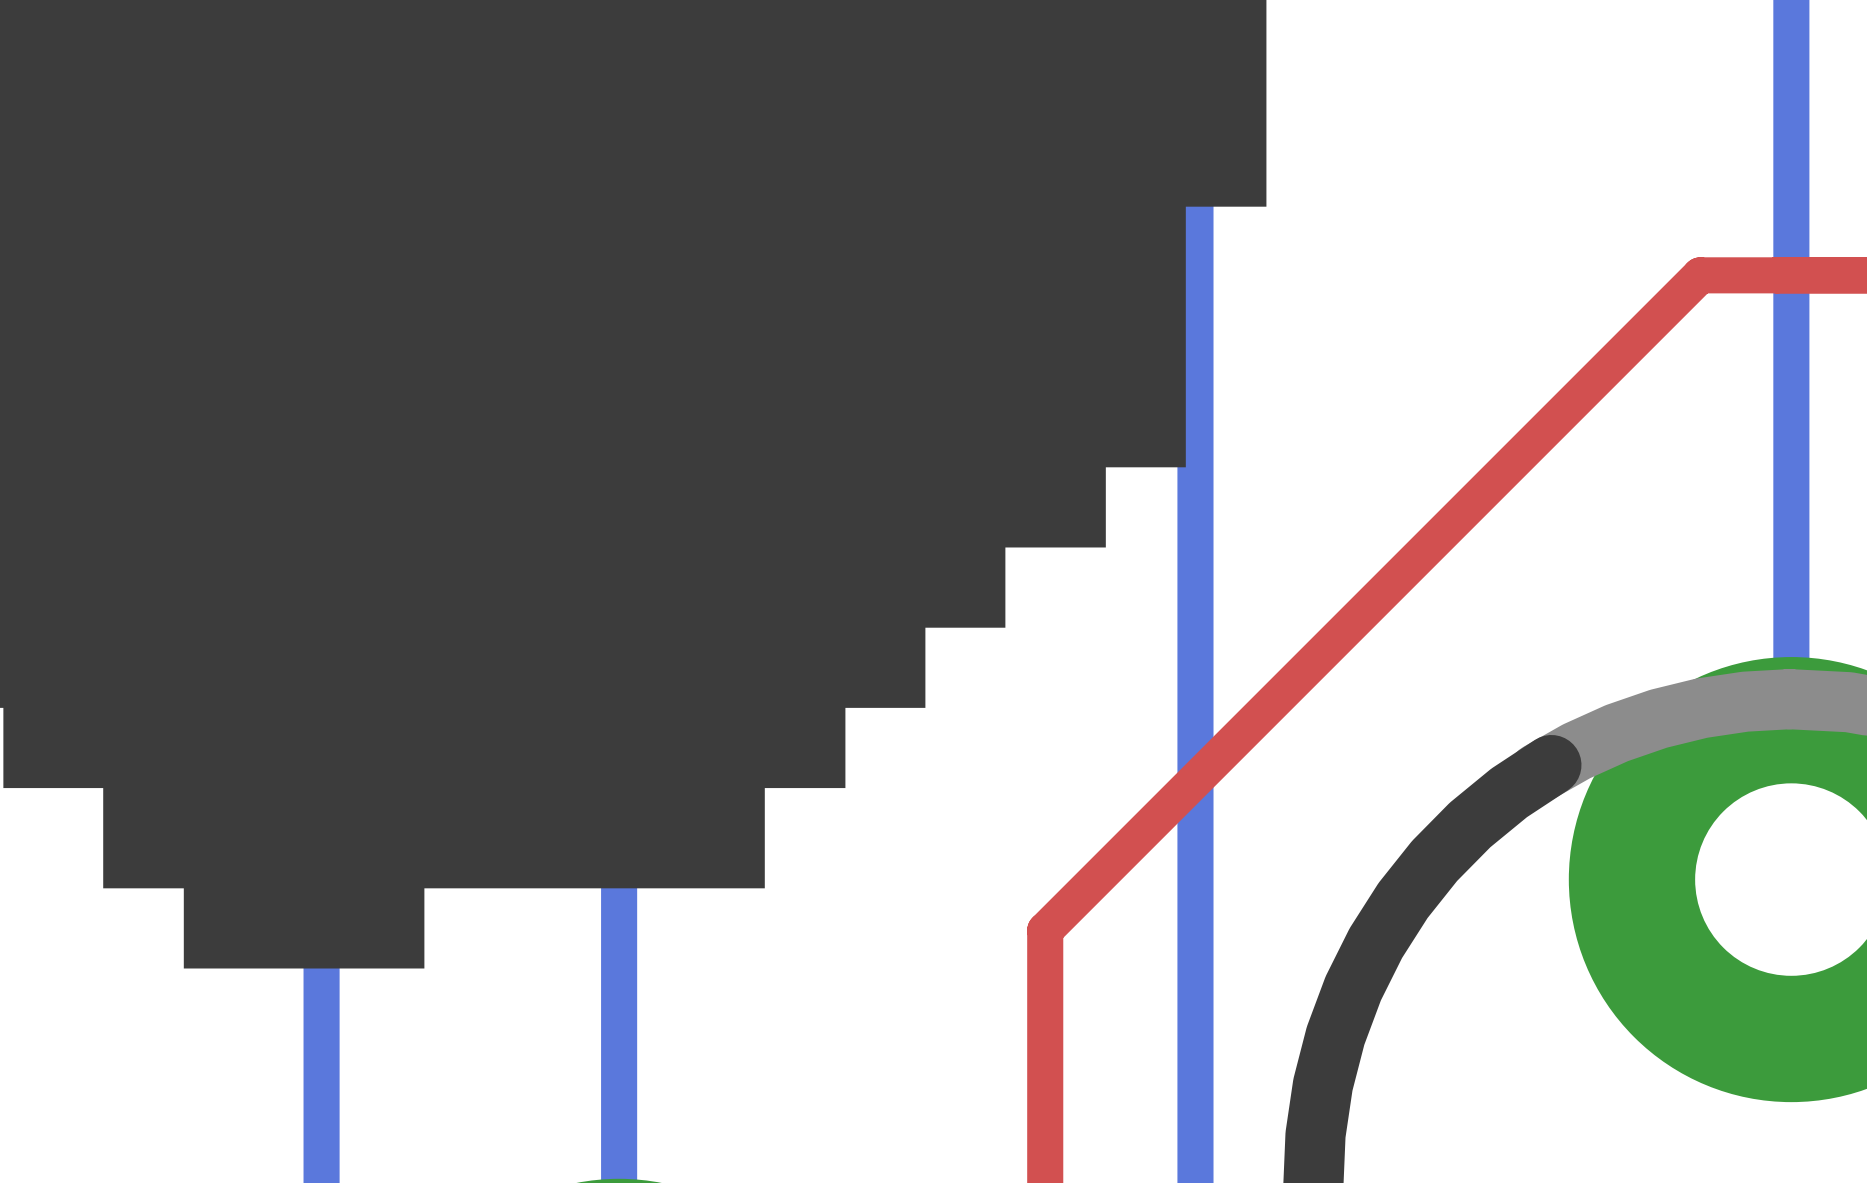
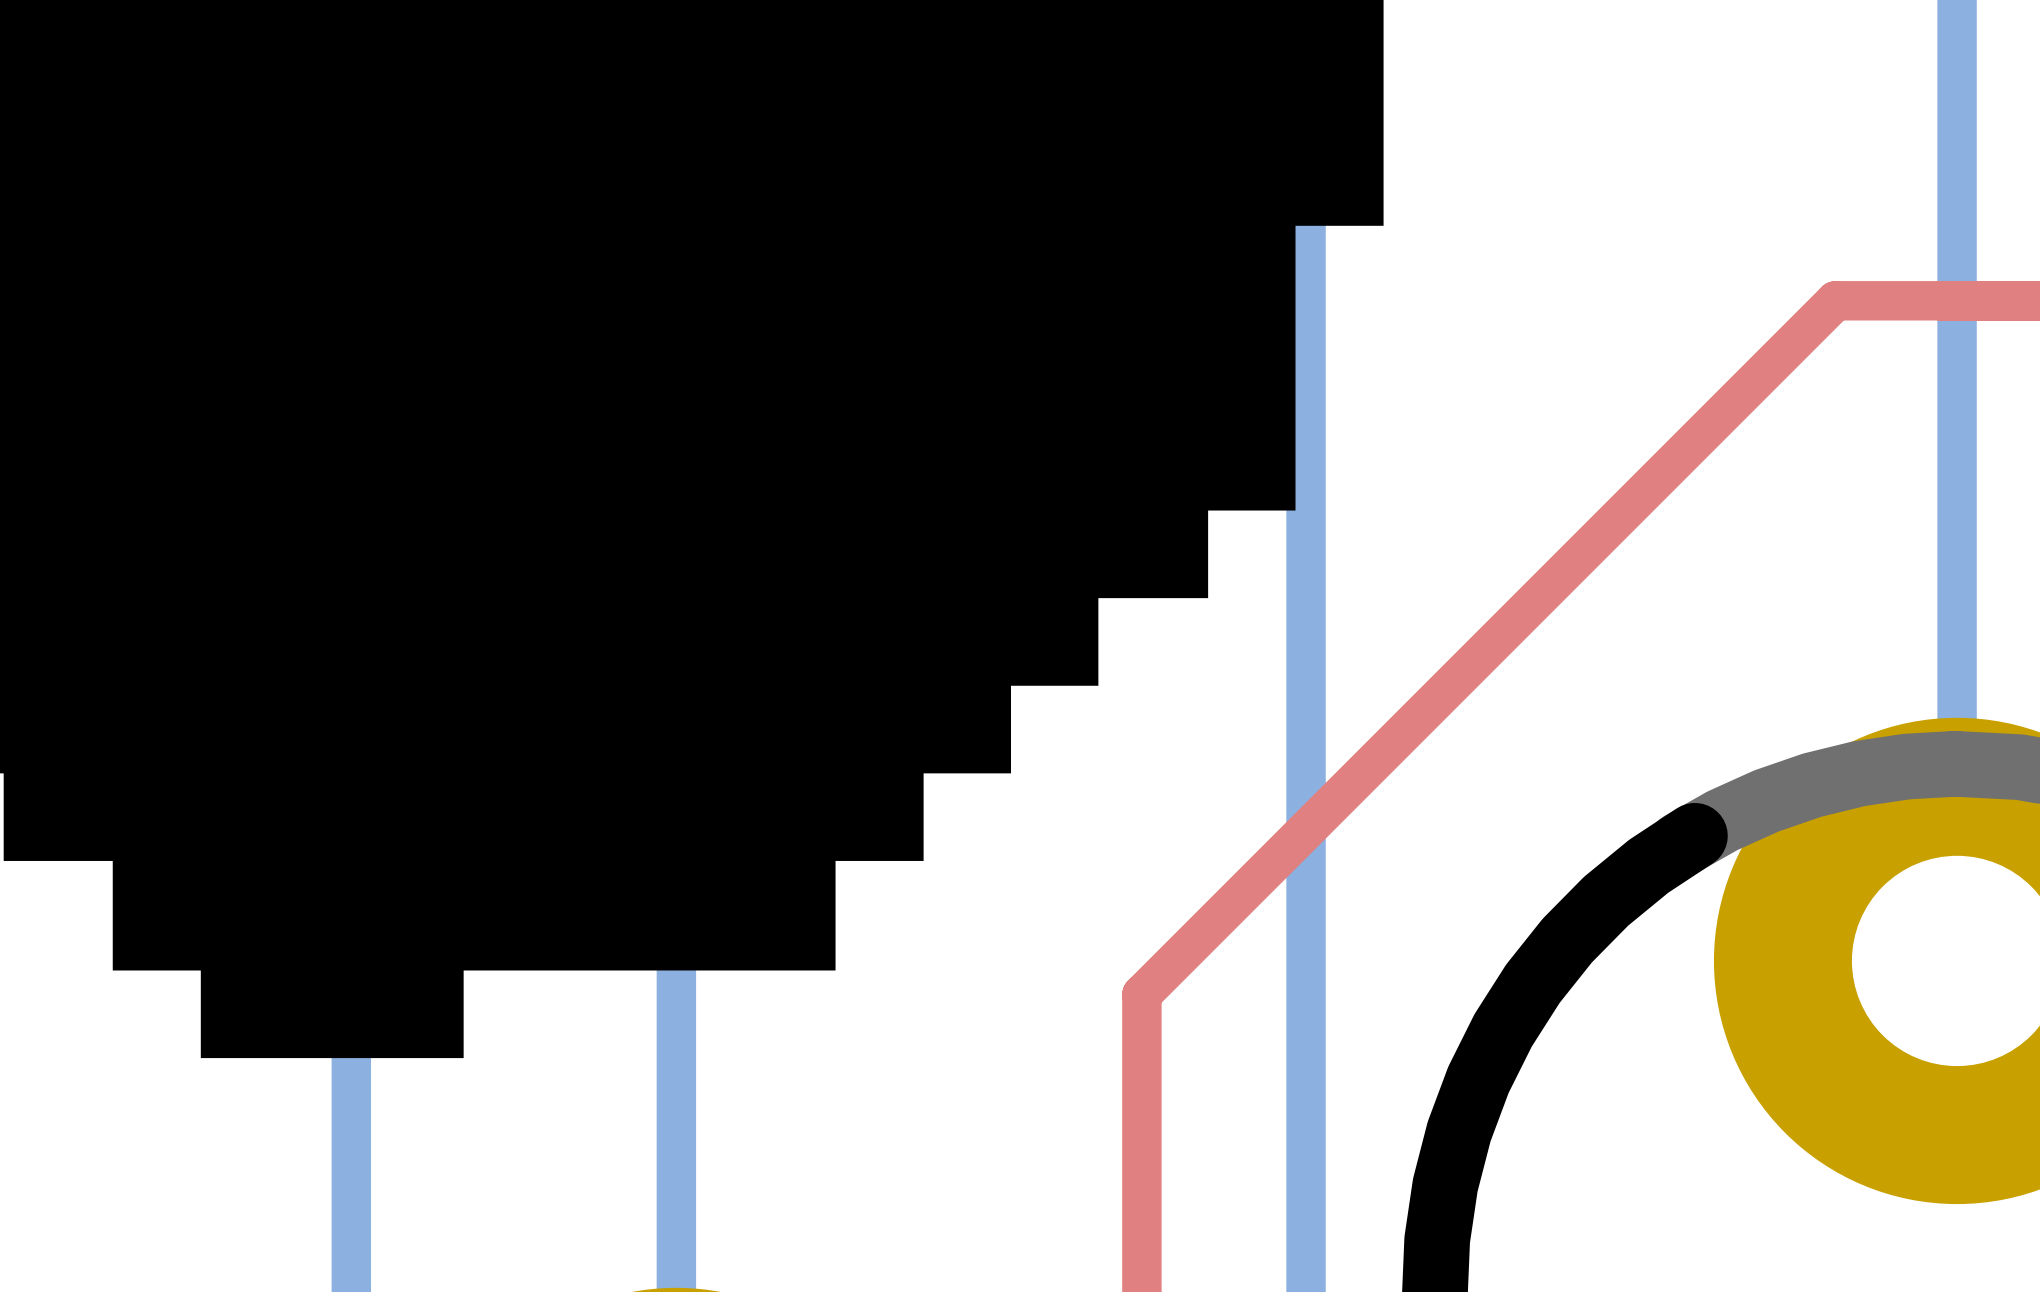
top track: (1700, 275) (1045, 930) -> (1857, 300) (1835, 300) (1141, 994) (1141, 1016)

